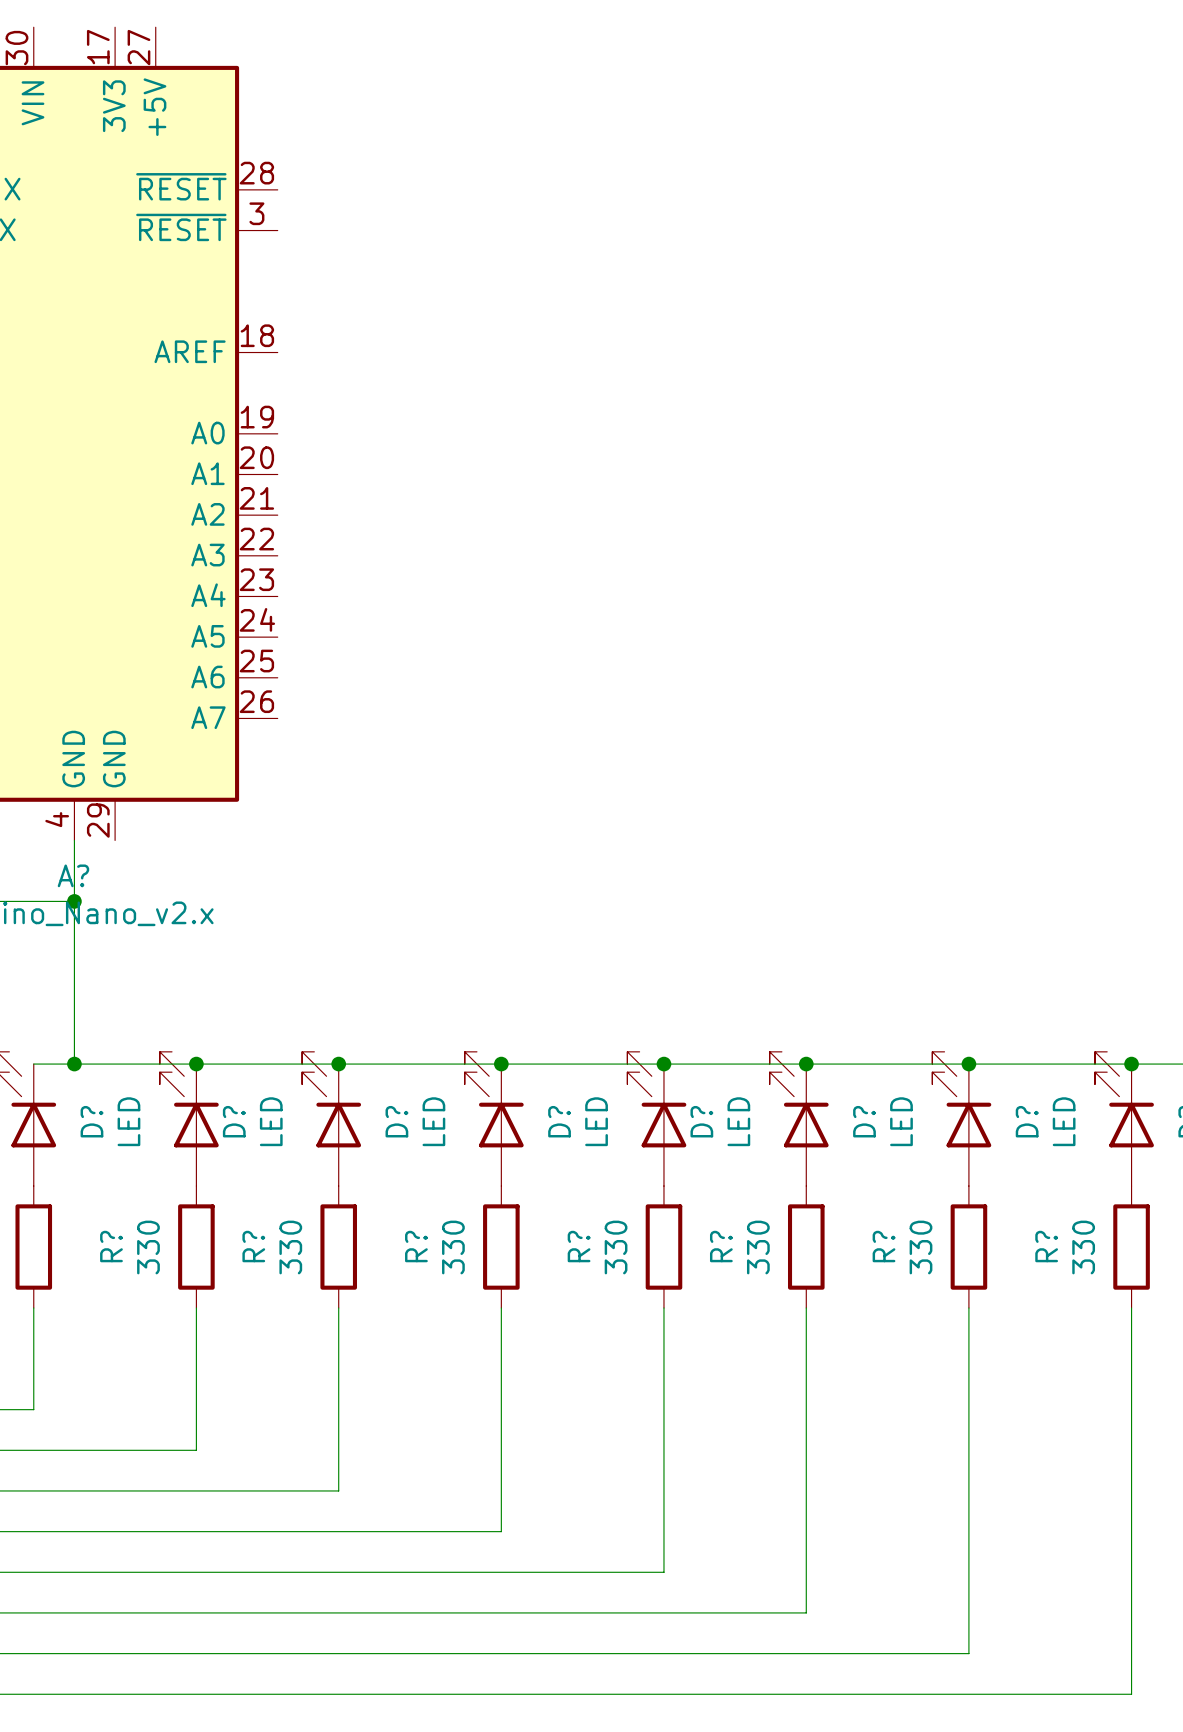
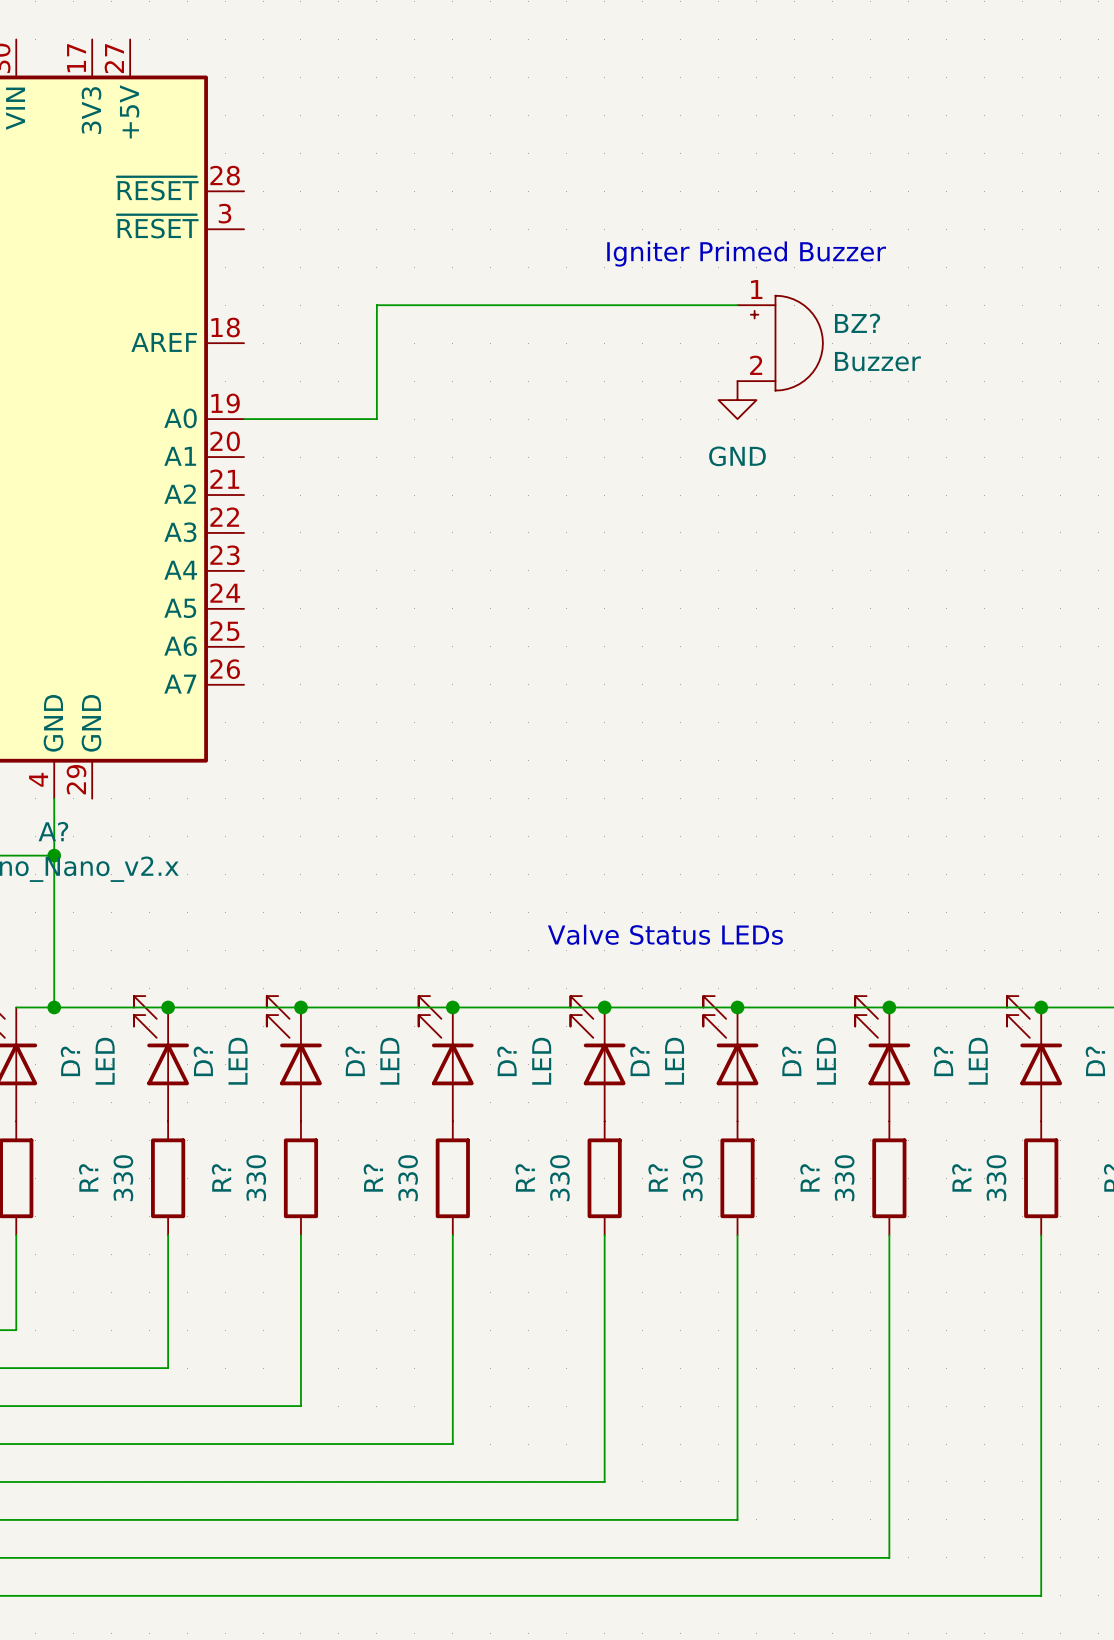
text: none -> Igniter Primed Buzzer (746, 253)
wire: none -> (737, 305) (376, 305) (376, 419) (244, 419)
BZ?: none -> Buzzer (780, 343)
power symbol: none -> GND (737, 400)
text: none -> Valve Status LEDs (665, 934)

